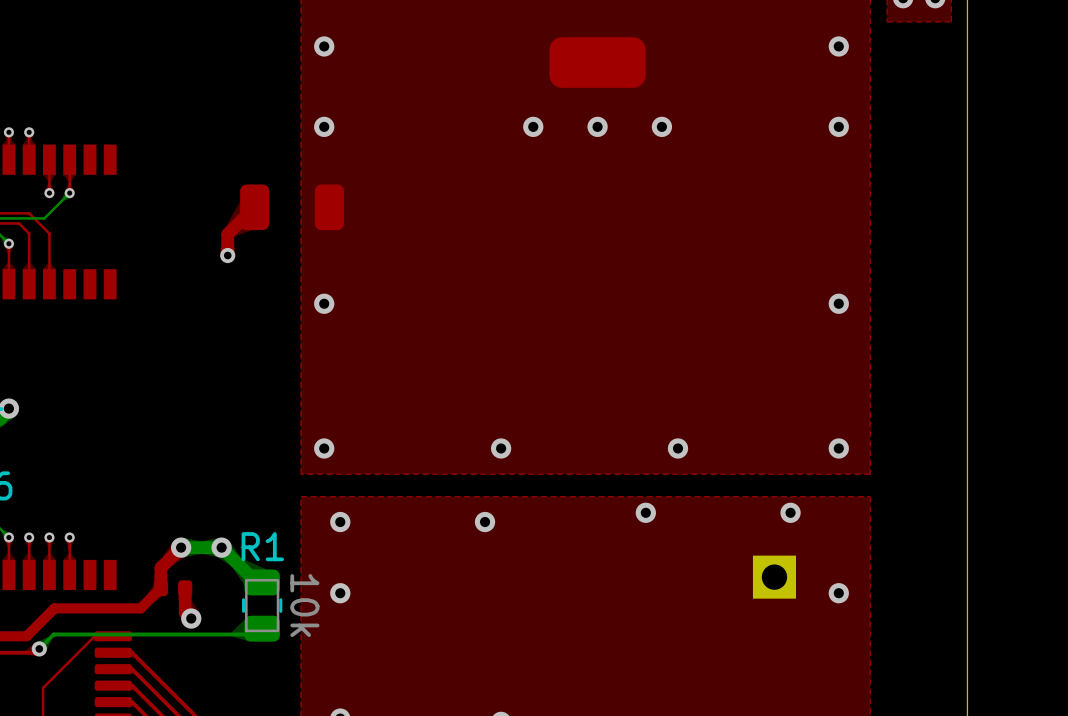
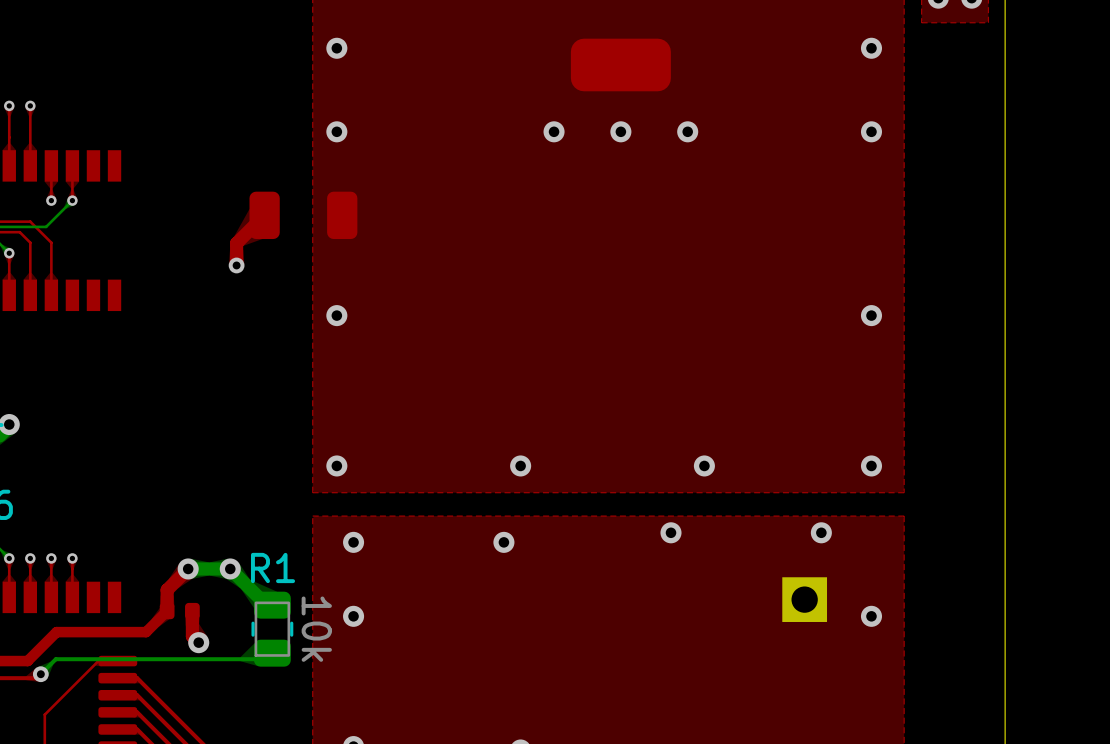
top track: none -> (9, 105) (9, 137)
via: none -> (9, 105)
top track: none -> (30, 105) (30, 137)
via: none -> (30, 105)
via: (8, 132) -> none
via: (29, 132) -> none

